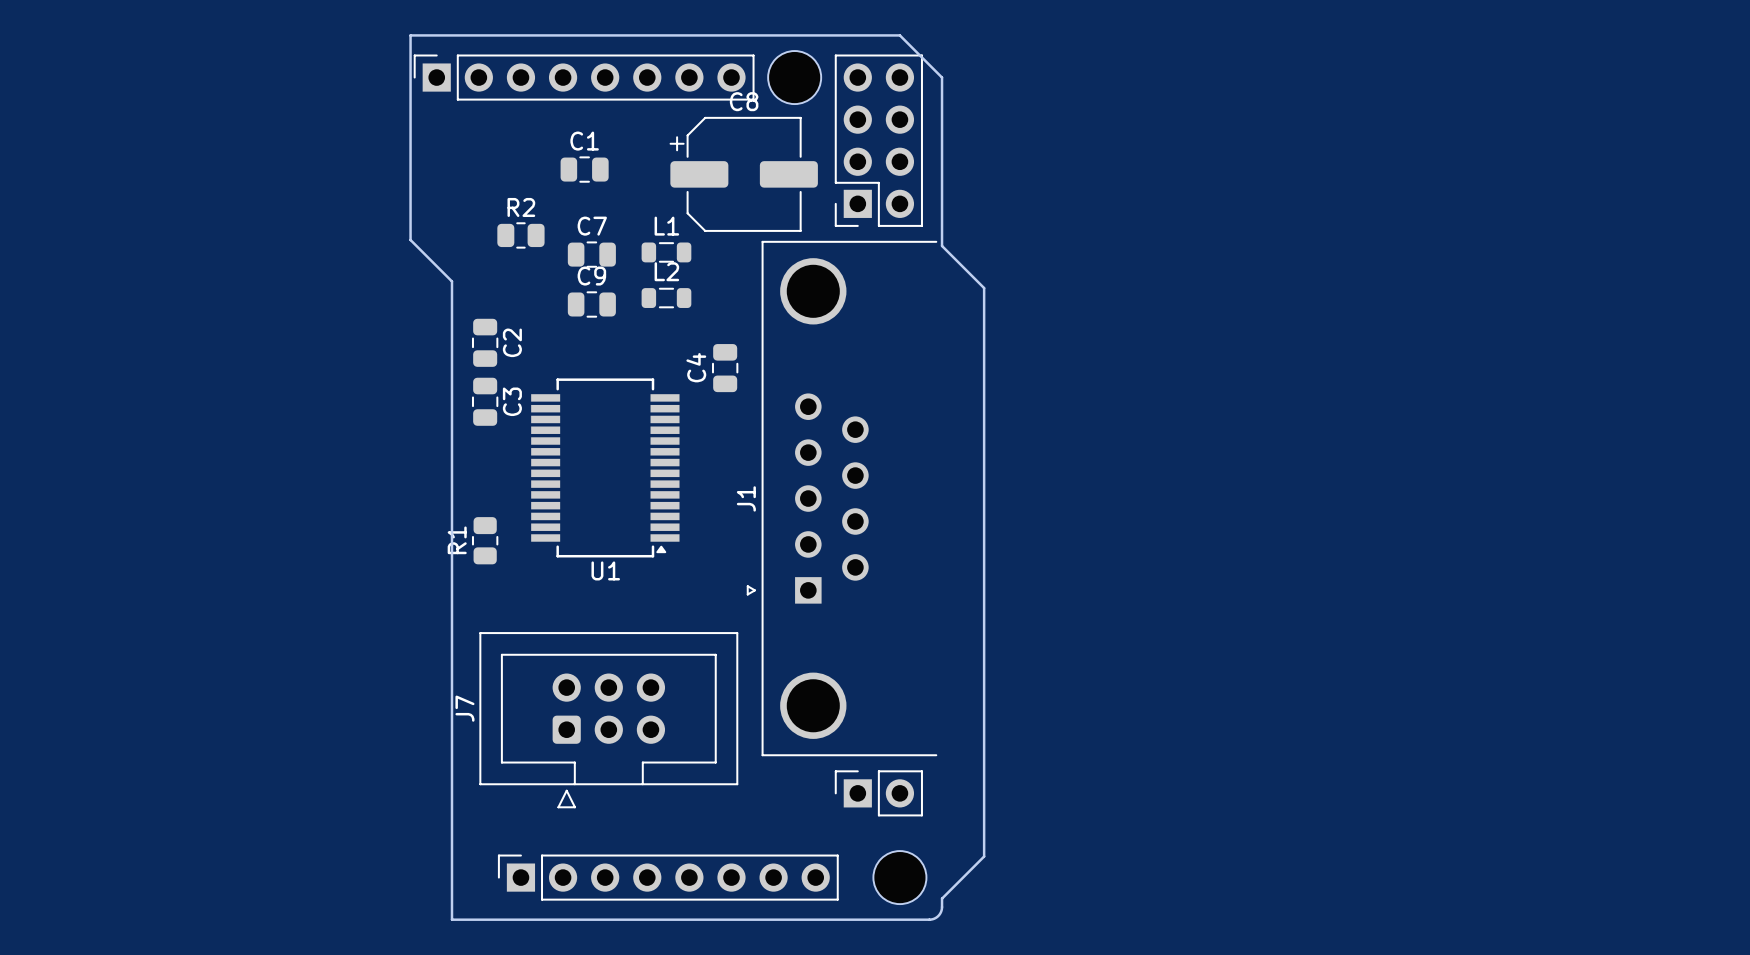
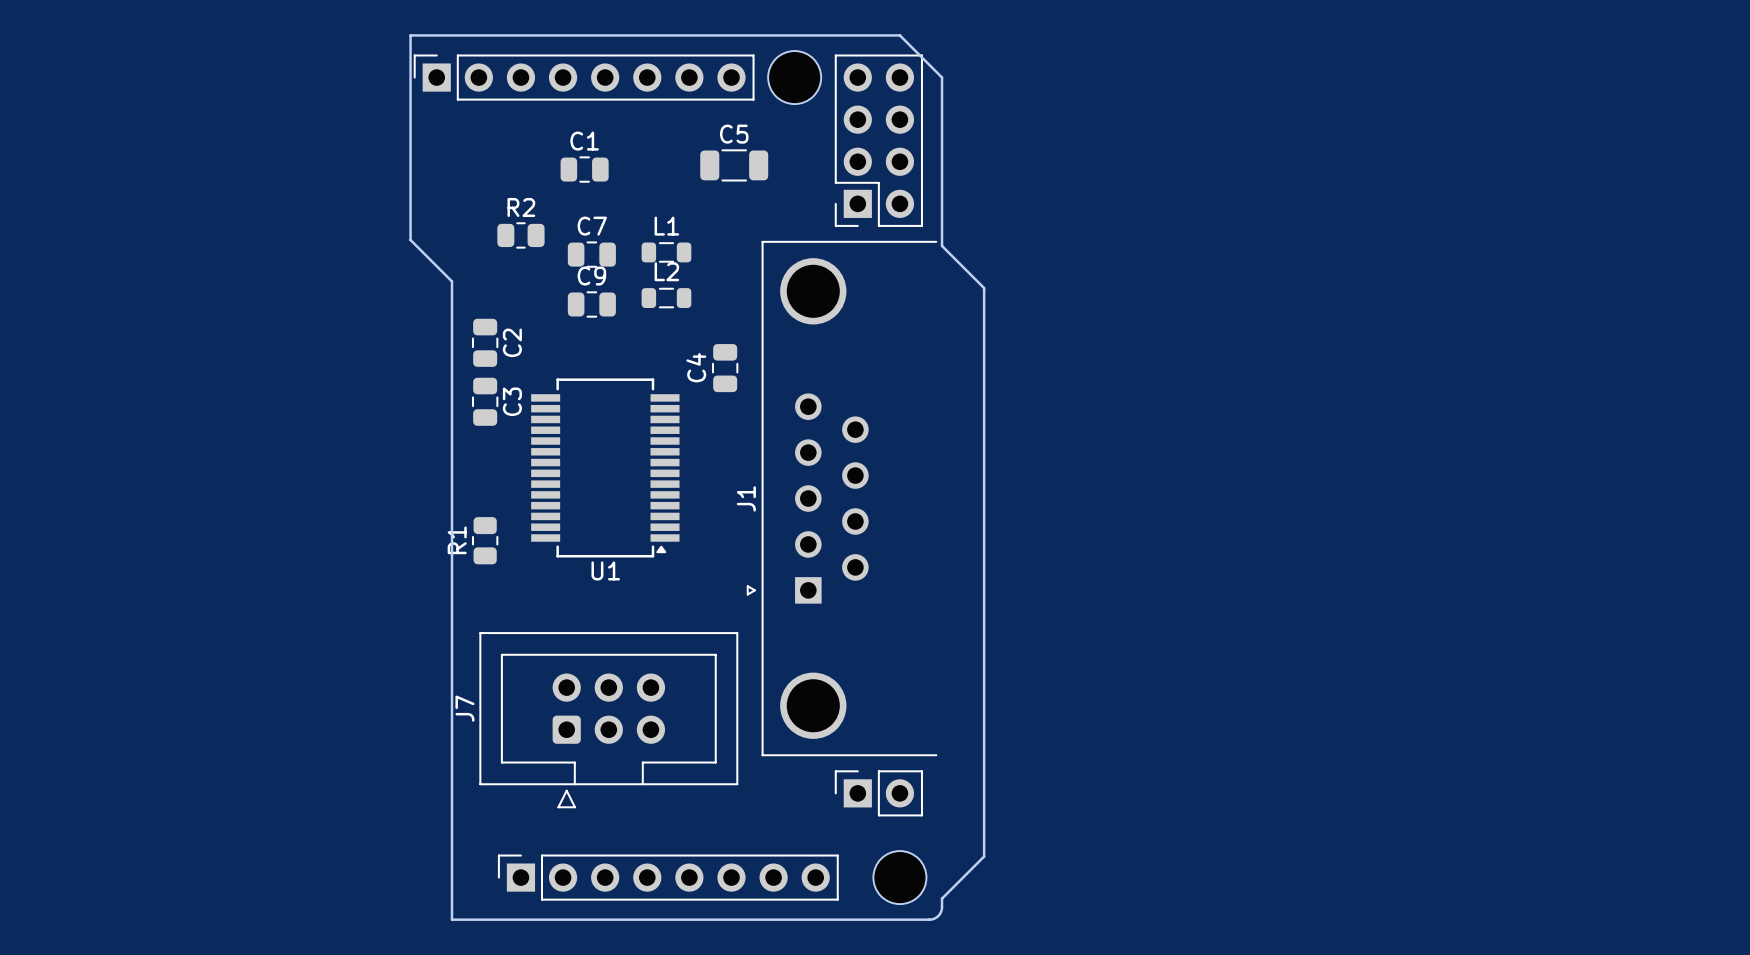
C5: none -> (734, 165)
C8: (743, 174) -> none

